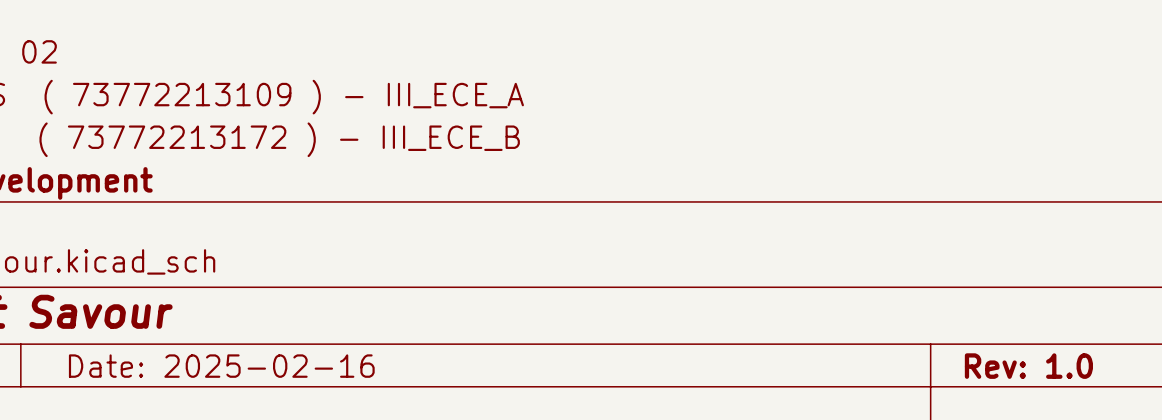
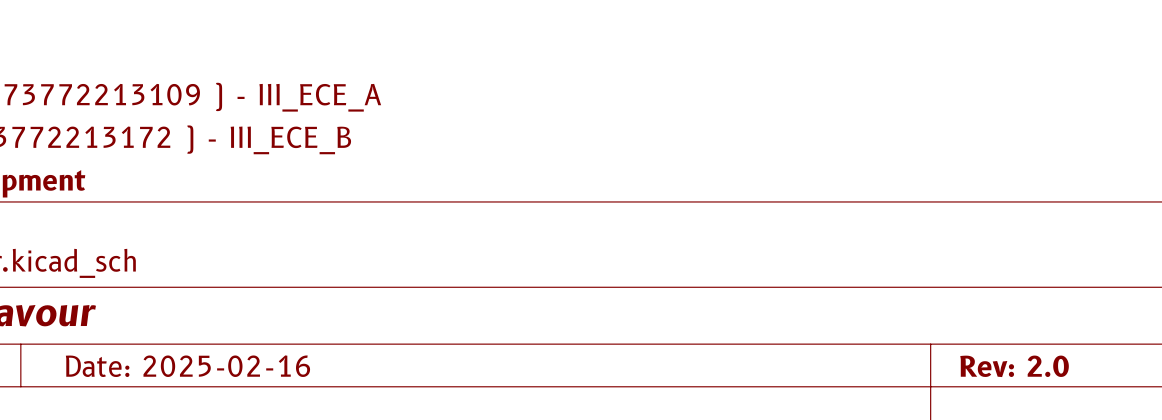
title block: Rev: 1.0 (1028, 366) -> Rev: 2.0 (1014, 366)

